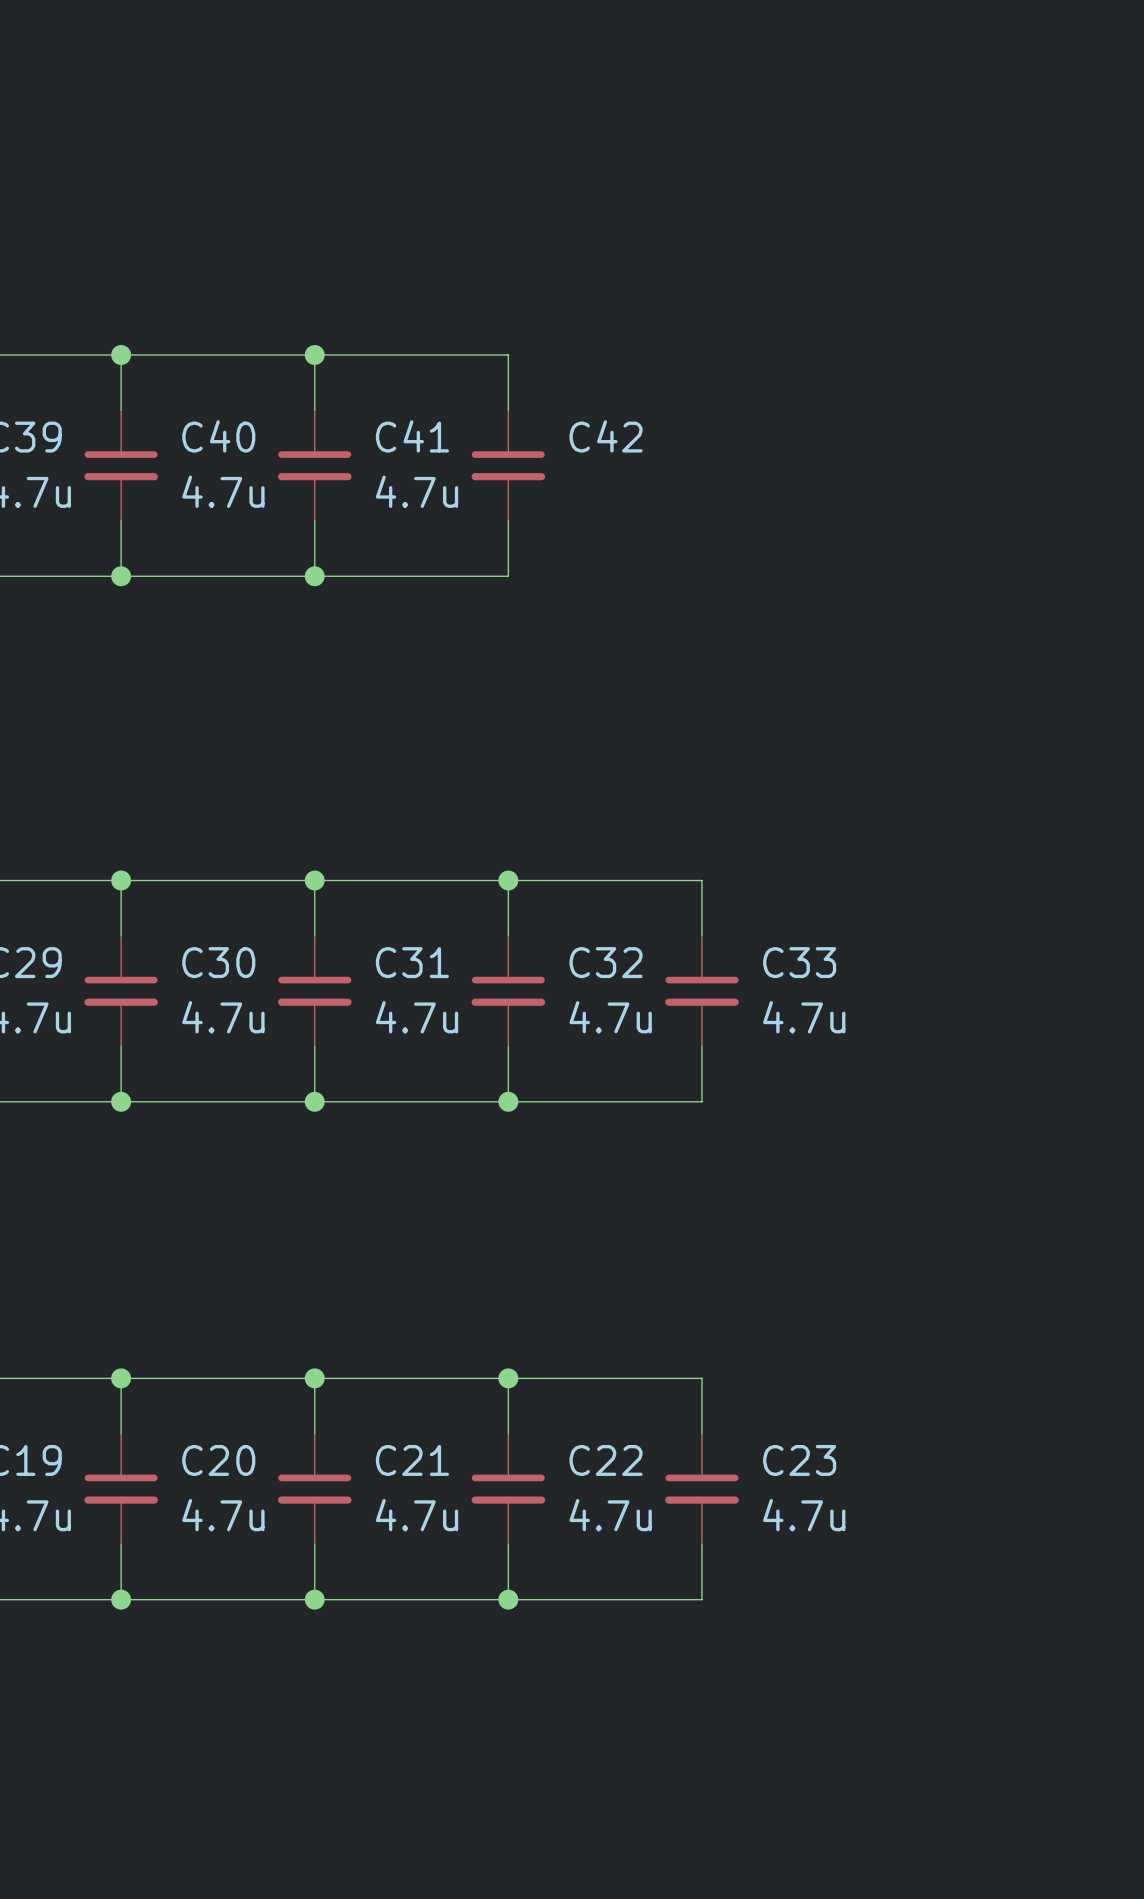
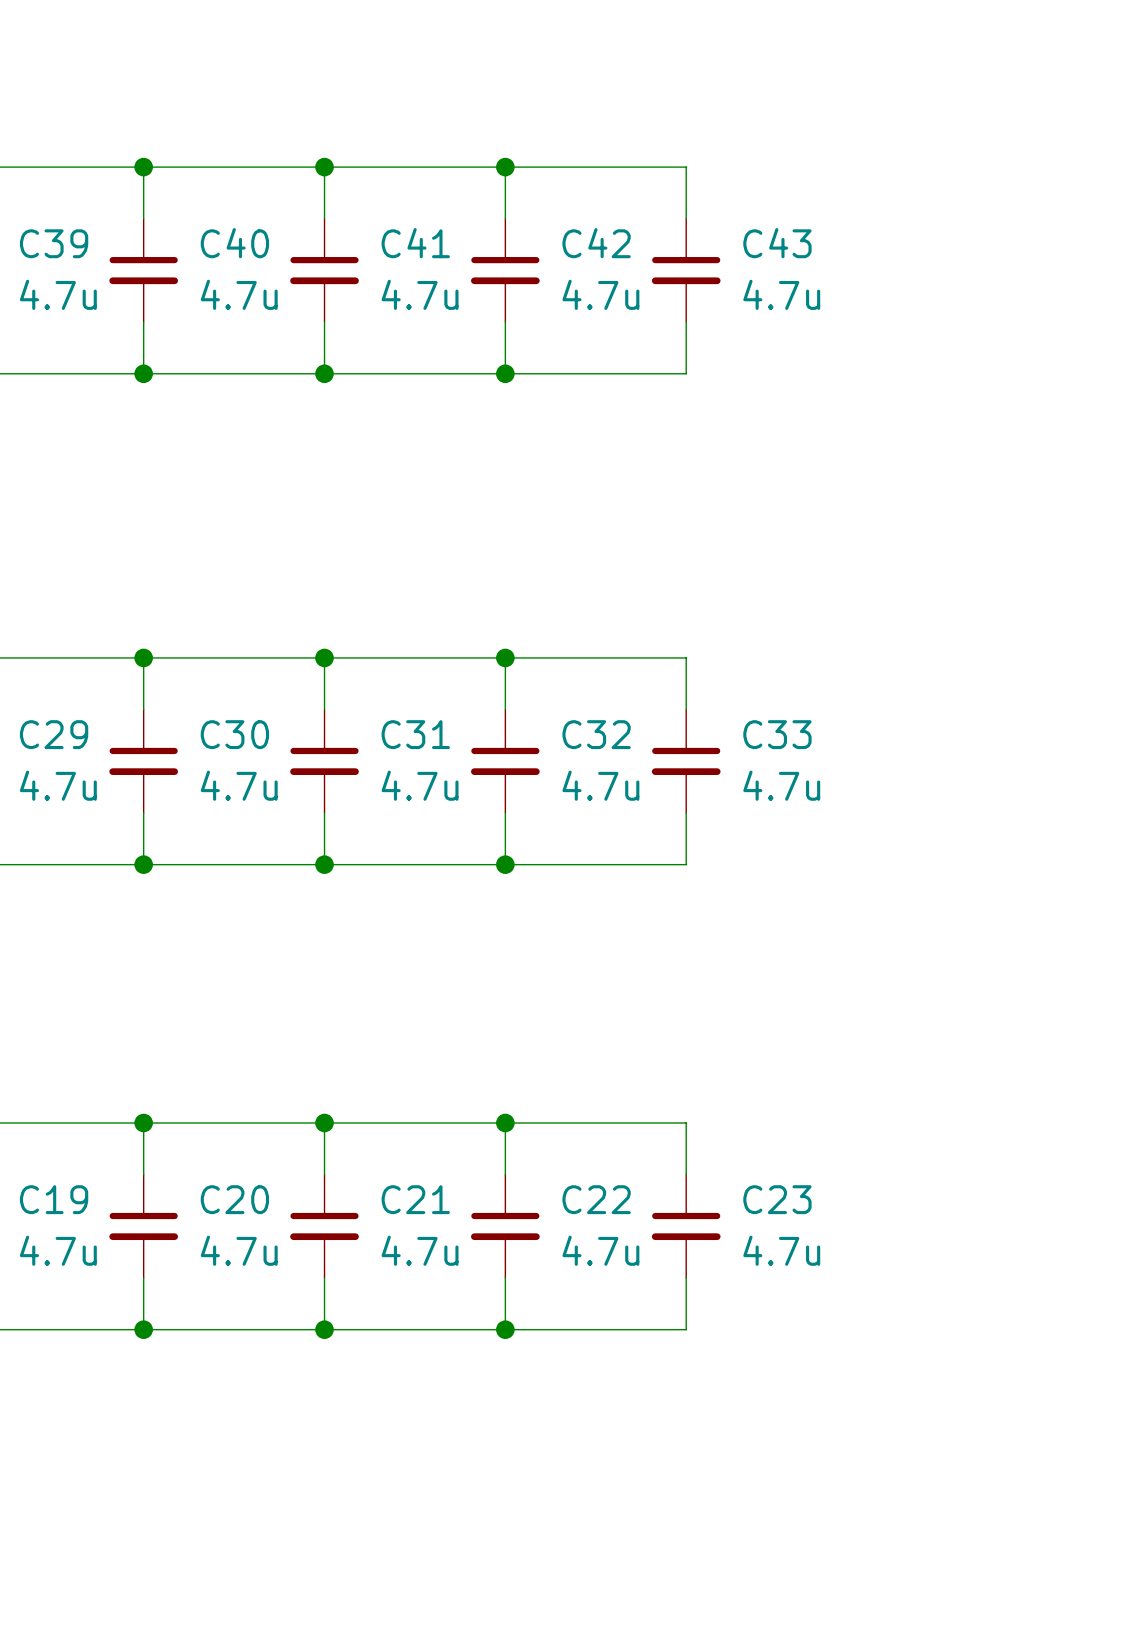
wire: none -> (505, 167) (686, 167) (686, 218)
junction: none -> (505, 167)
C43: none -> 4.7u (686, 270)
C42 value: none -> 4.7u (600, 294)
wire: none -> (686, 322) (686, 373) (505, 373)
junction: none -> (505, 373)

